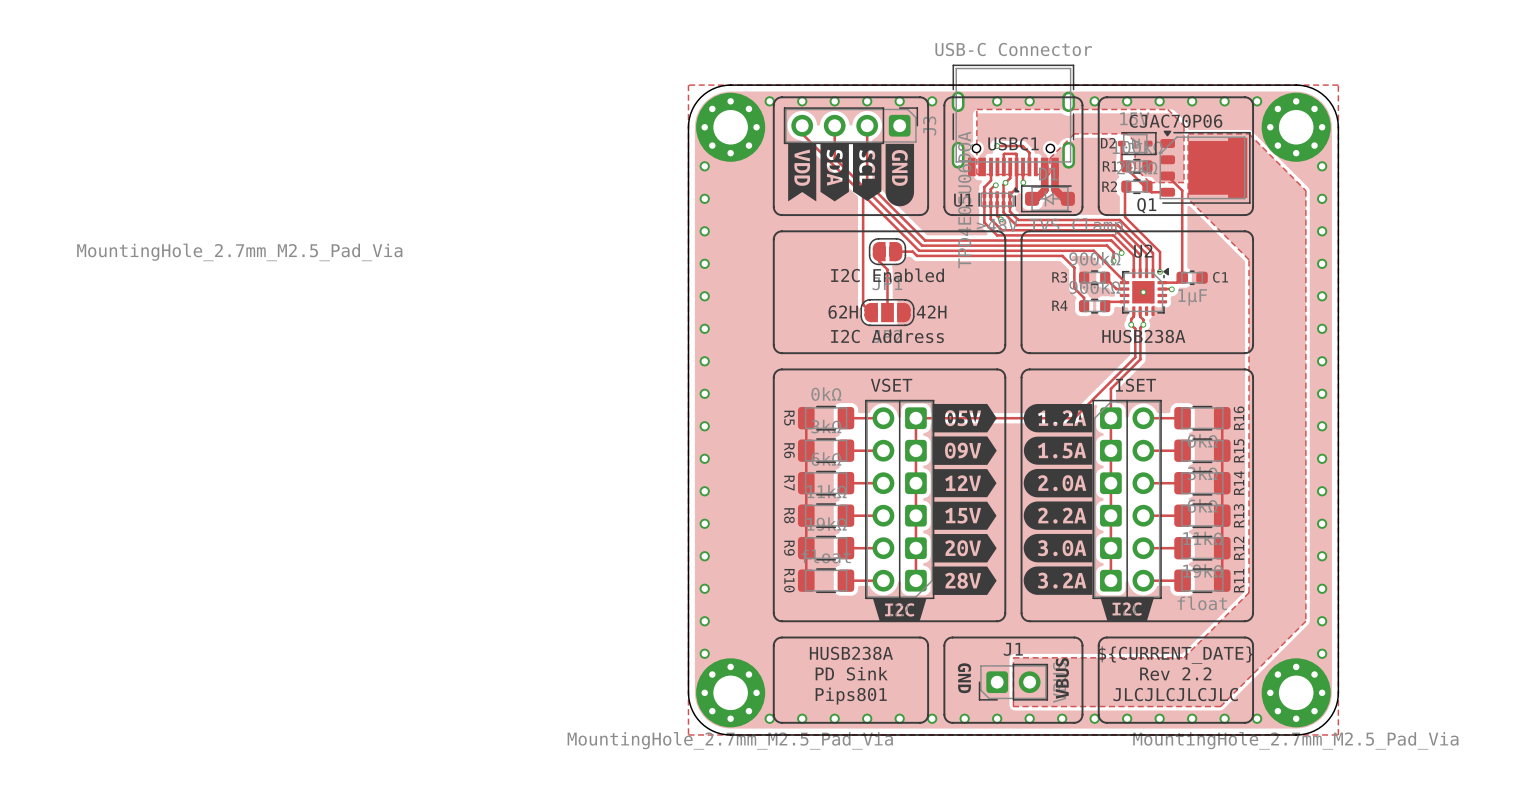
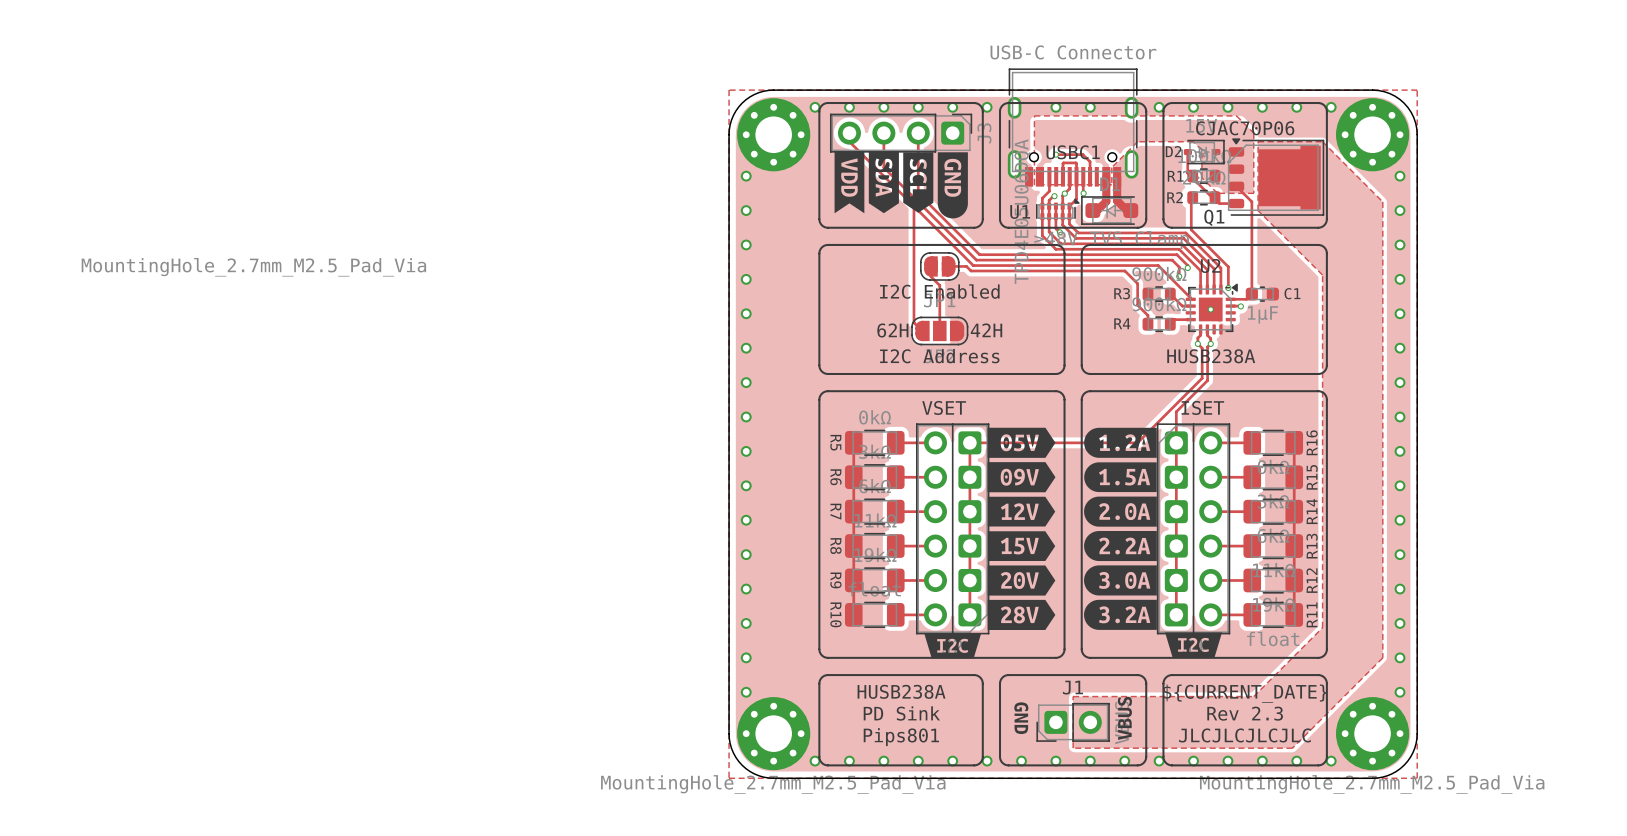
text: Rev 2.2 (1175, 673) -> Rev 2.3 (1245, 713)

